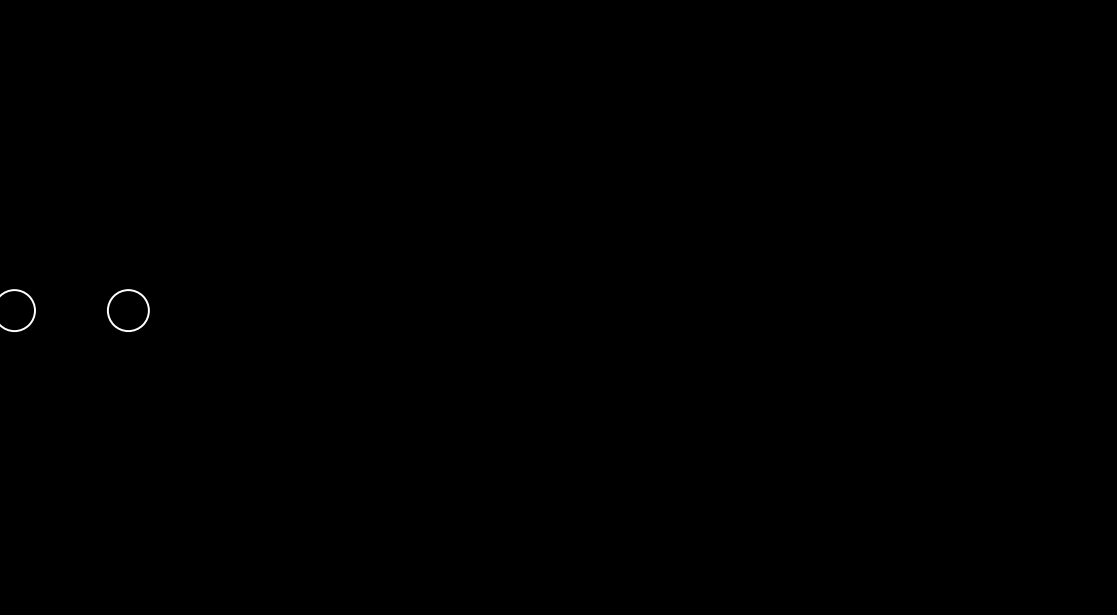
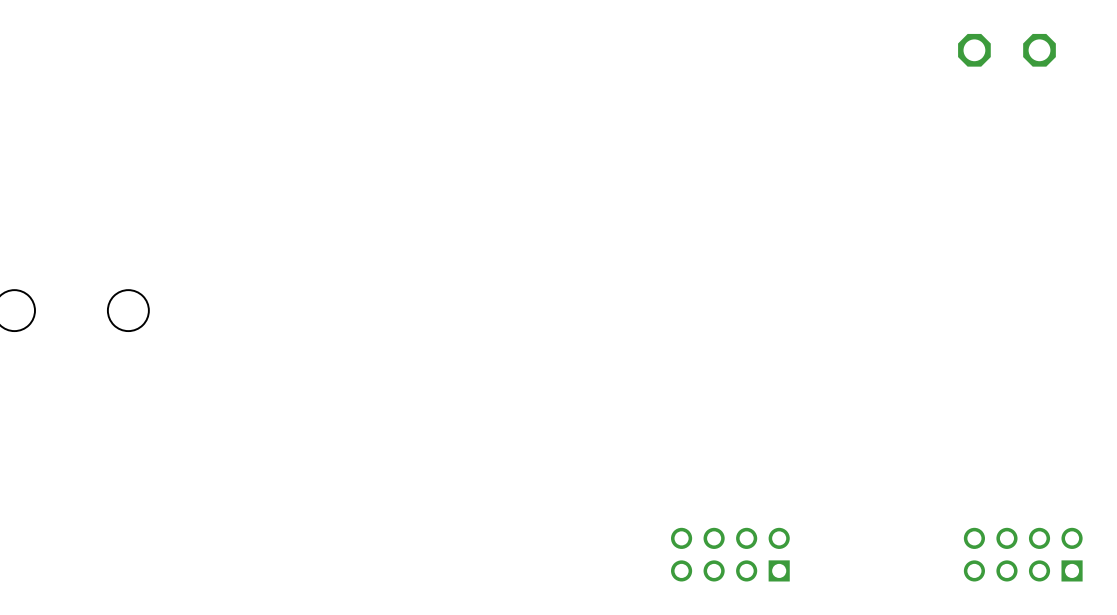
part: none -> (974, 50)
part: none -> (1039, 50)
part: none -> (730, 554)
part: none -> (1023, 554)

